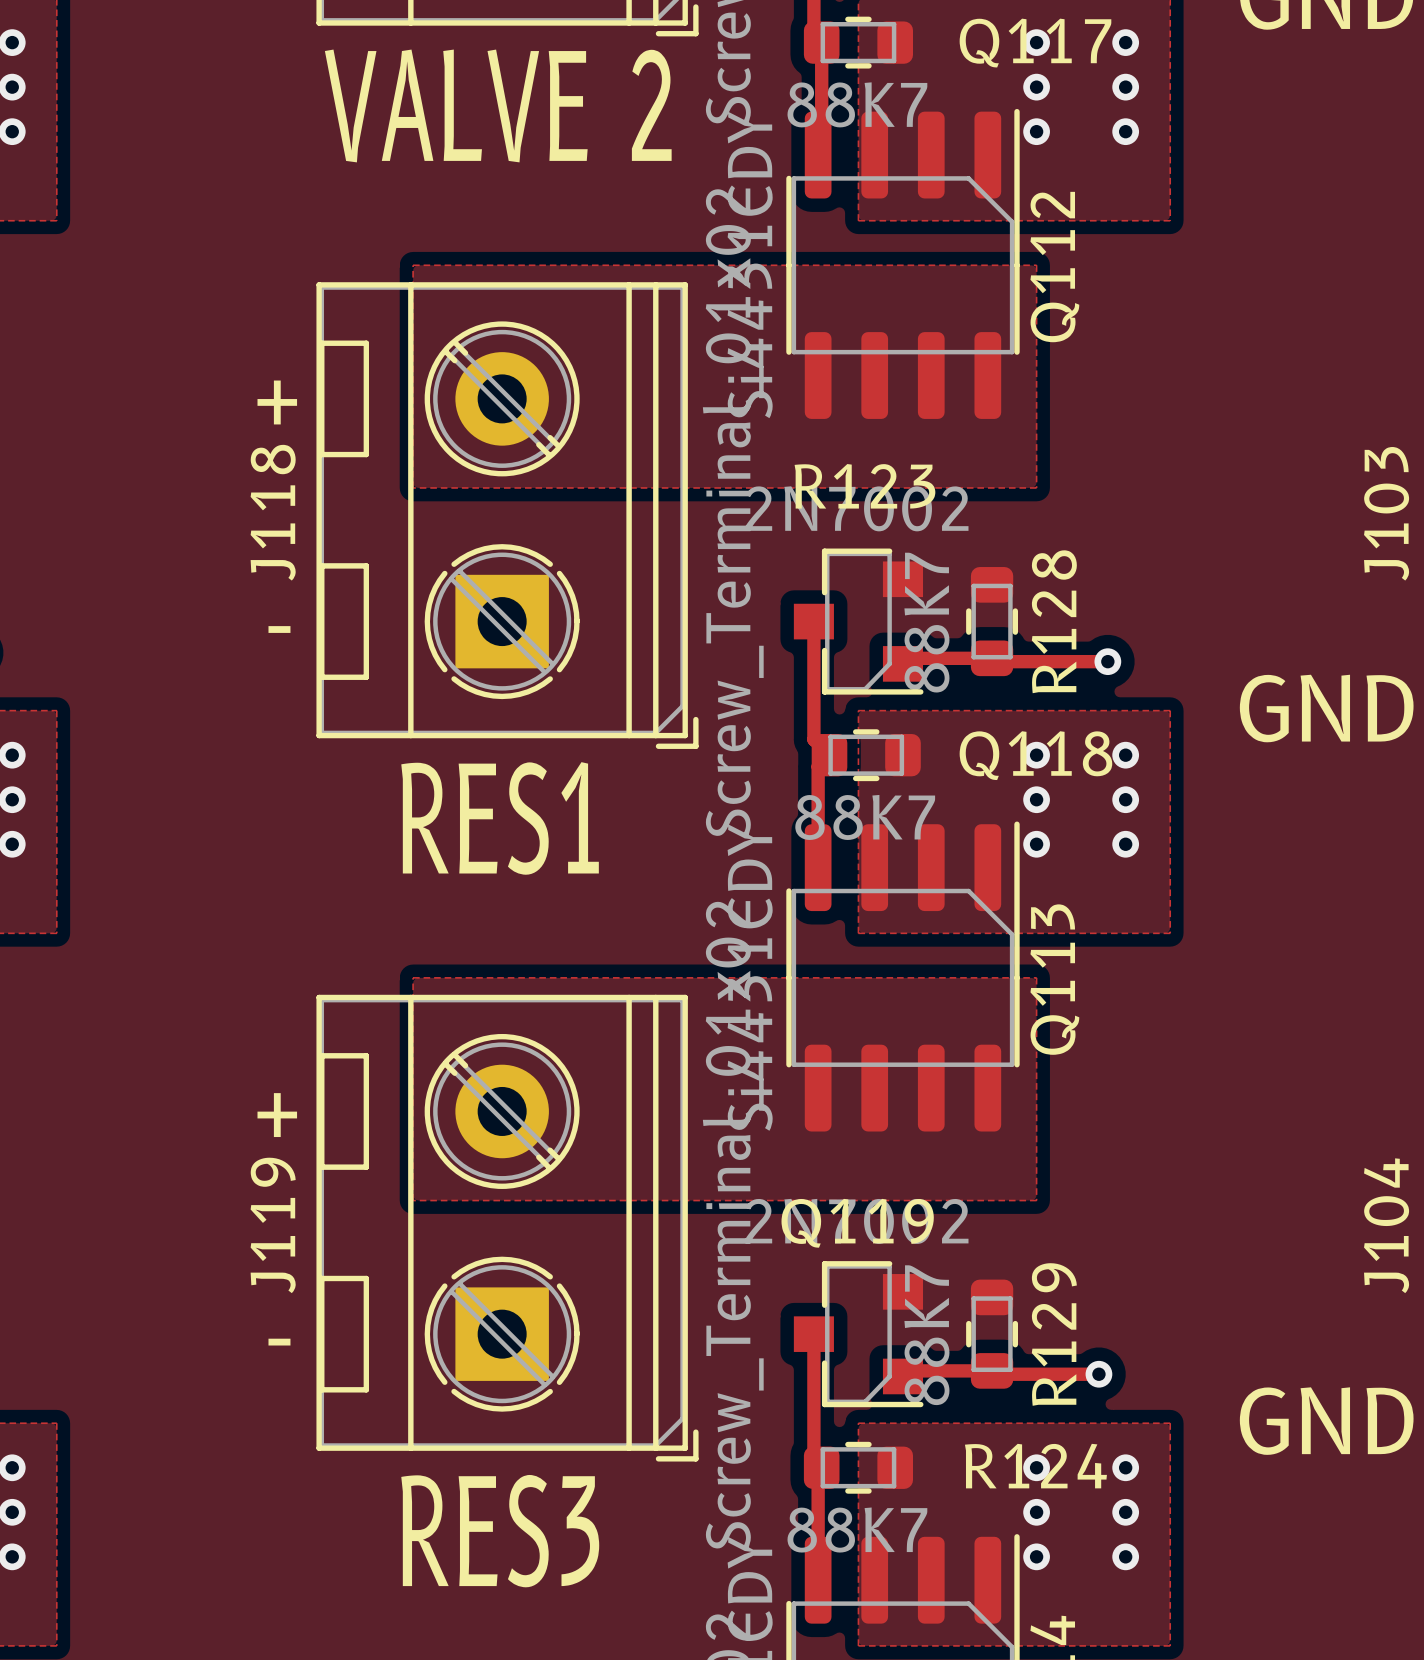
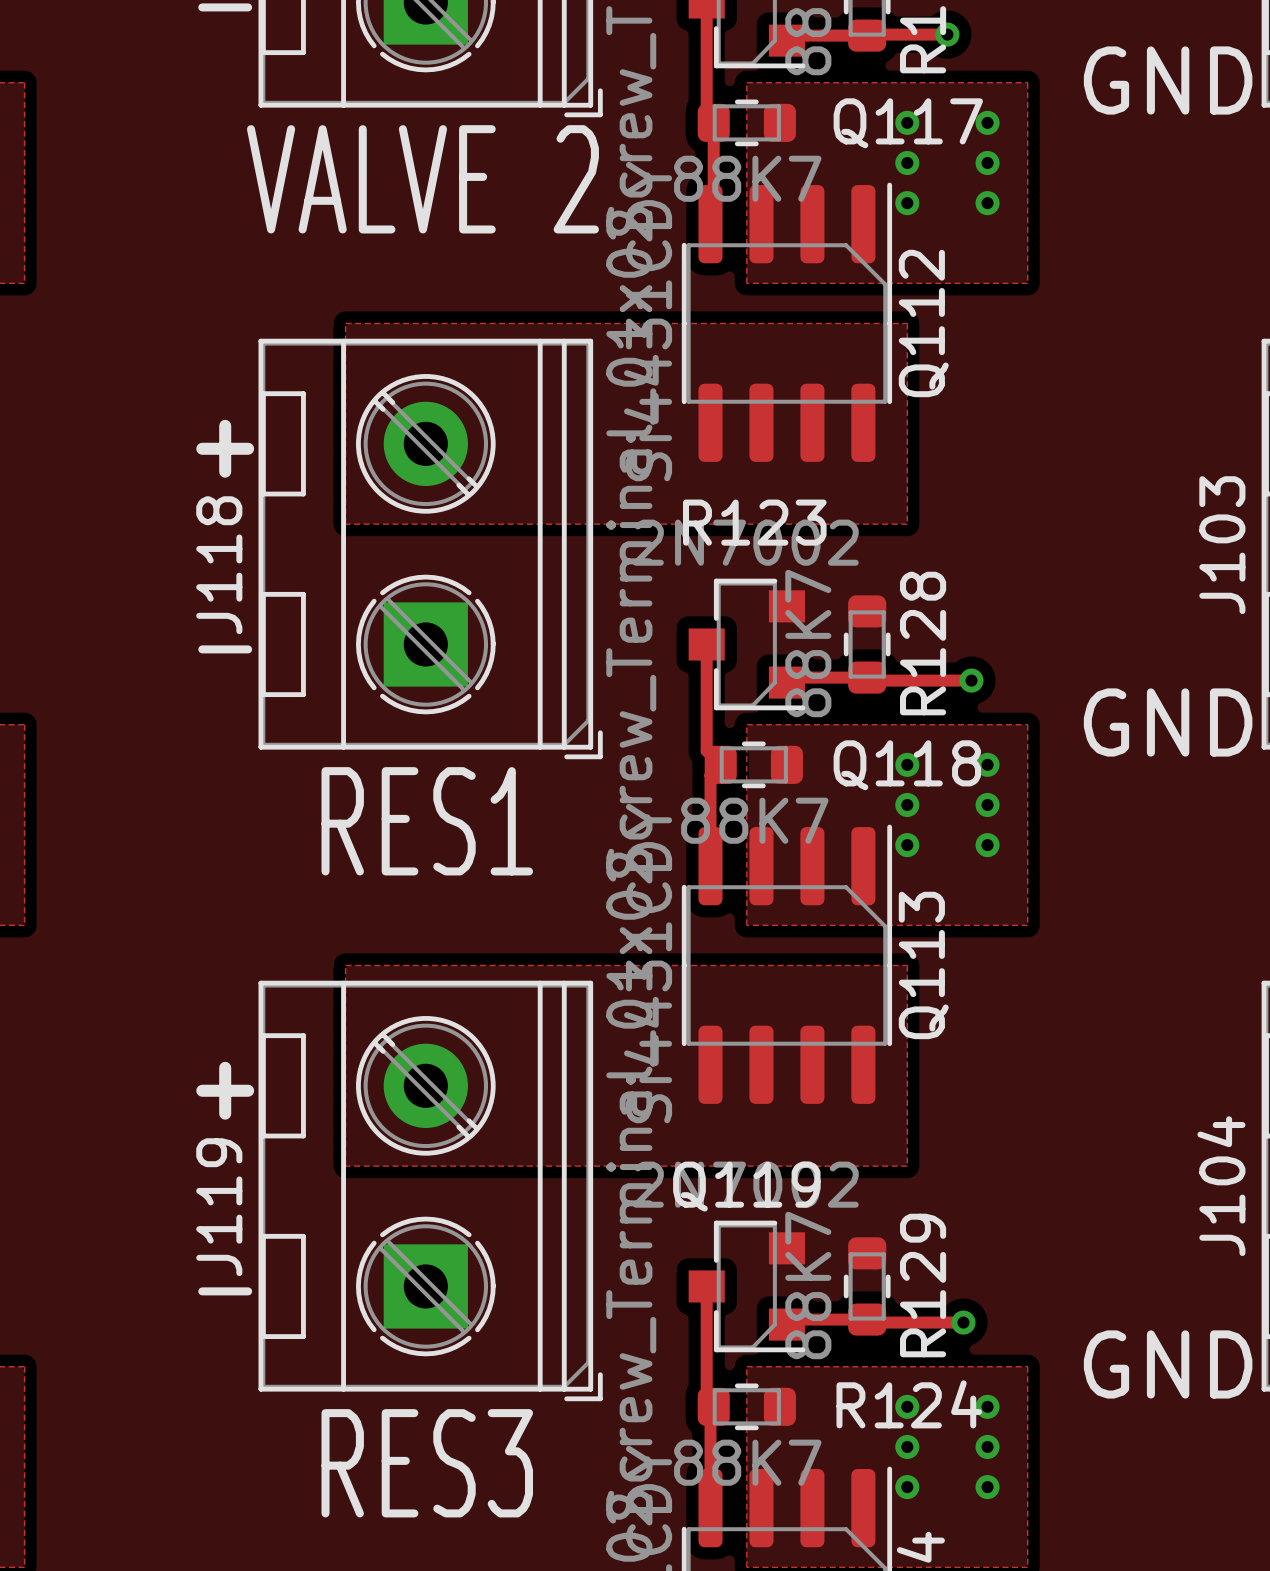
J118 name position: J118 (273, 512) -> J118 (219, 565)
J119 name position: J119 (273, 1225) -> J119 (219, 1207)

